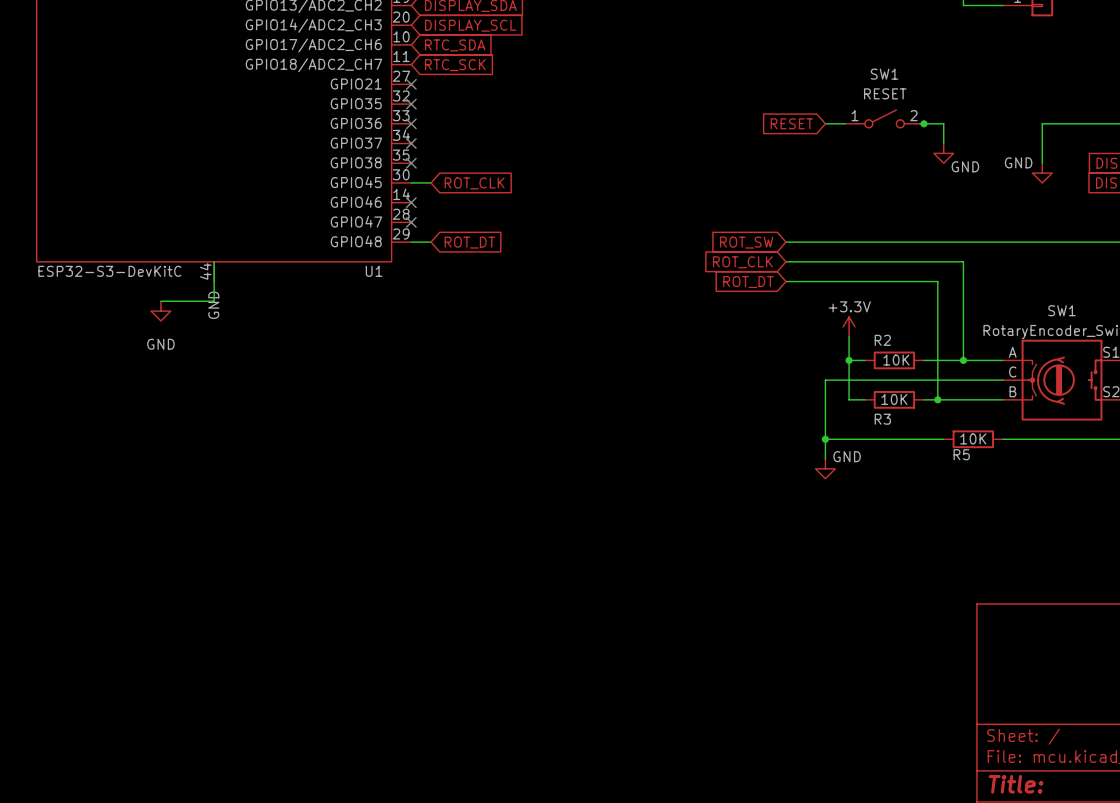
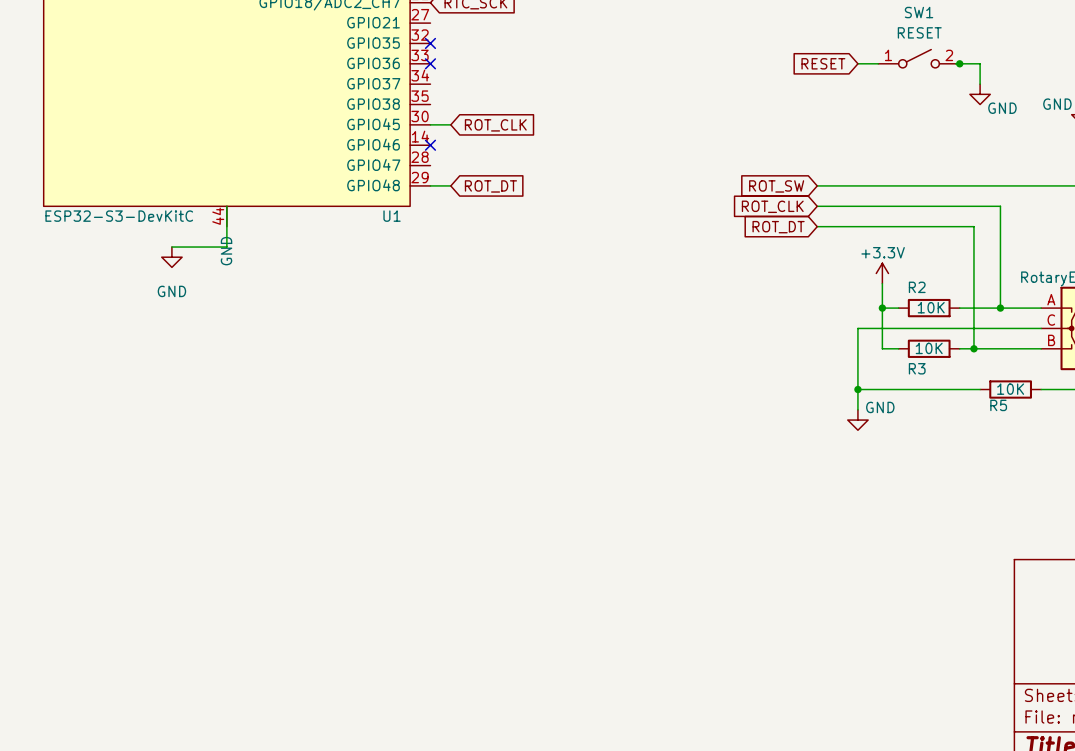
no-connect mark: (411, 84) -> none
no-connect mark: (411, 143) -> none
no-connect mark: (411, 163) -> none
no-connect mark: (411, 222) -> none

